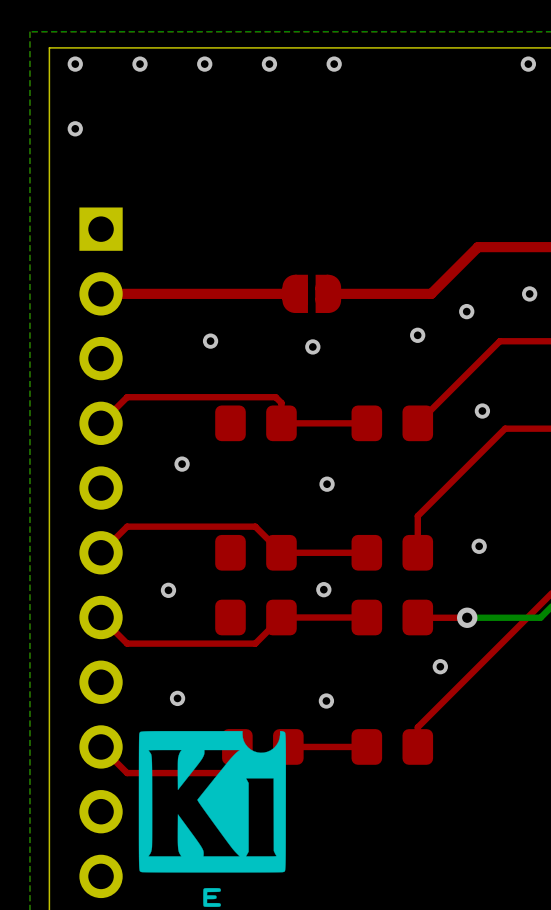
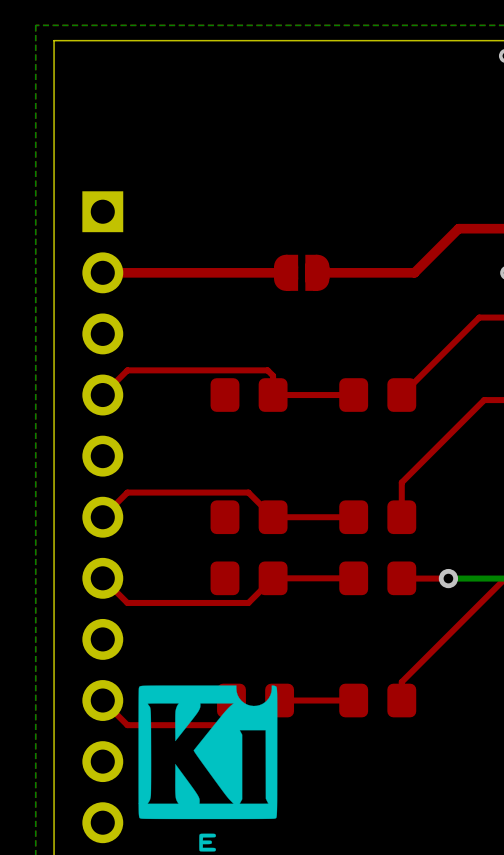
via: (75, 64) -> none
via: (140, 64) -> none
via: (204, 64) -> none
via: (269, 64) -> none
via: (334, 64) -> none
via: (75, 128) -> none
via: (466, 311) -> none
via: (417, 335) -> none
via: (210, 341) -> none
via: (312, 346) -> none
via: (482, 411) -> none
via: (182, 464) -> none
via: (327, 484) -> none
via: (479, 546) -> none
via: (323, 589) -> none
via: (168, 590) -> none
via: (440, 666) -> none
via: (177, 698) -> none
via: (326, 701) -> none

